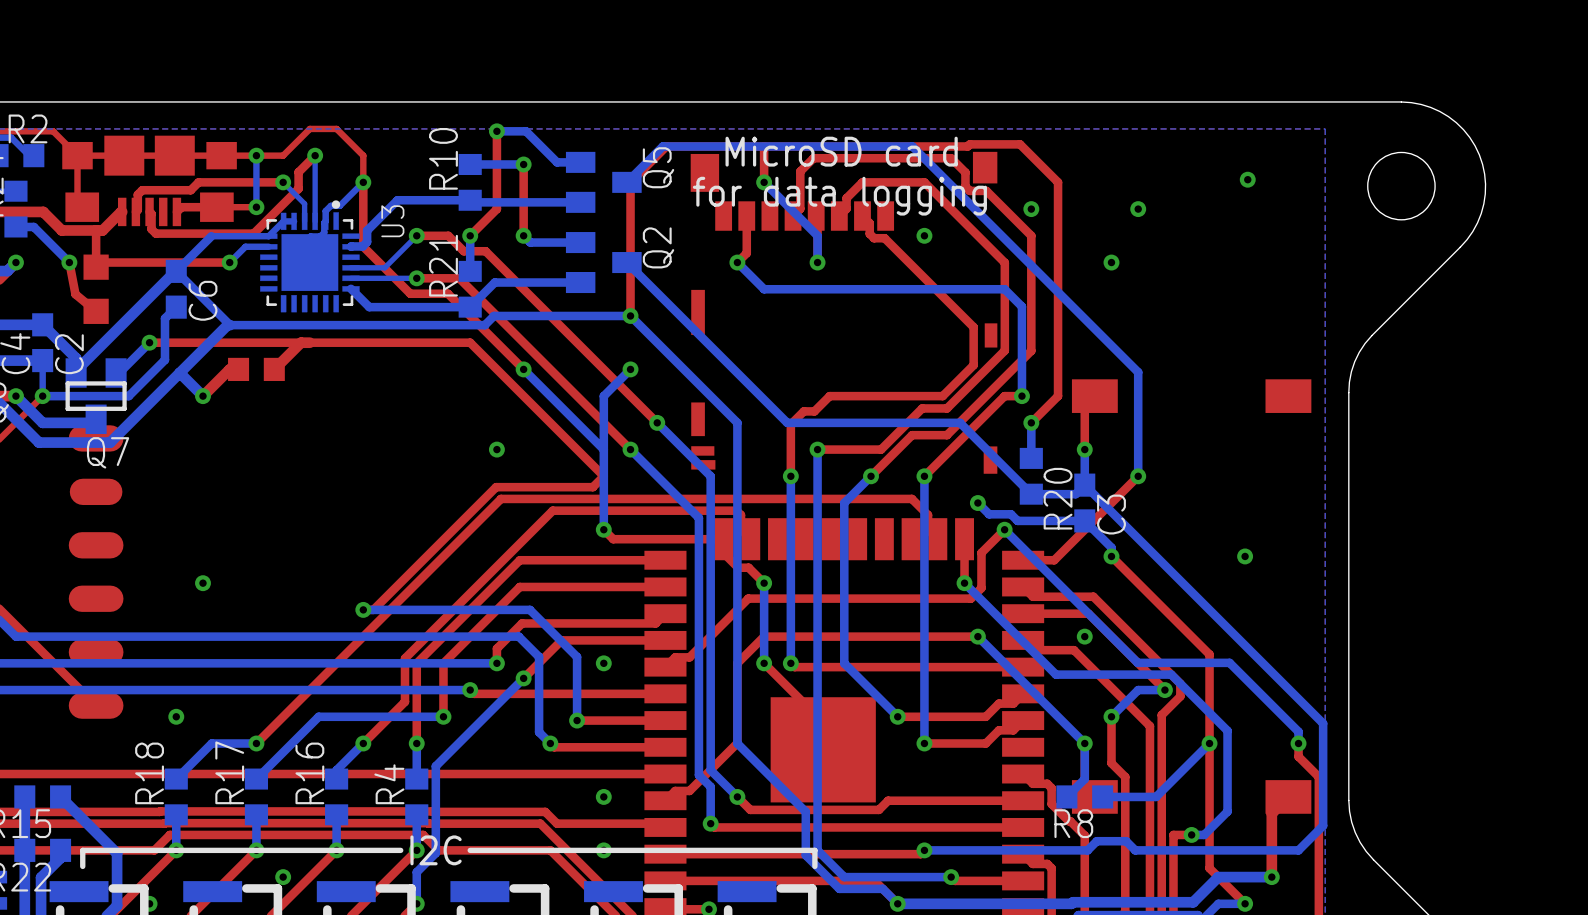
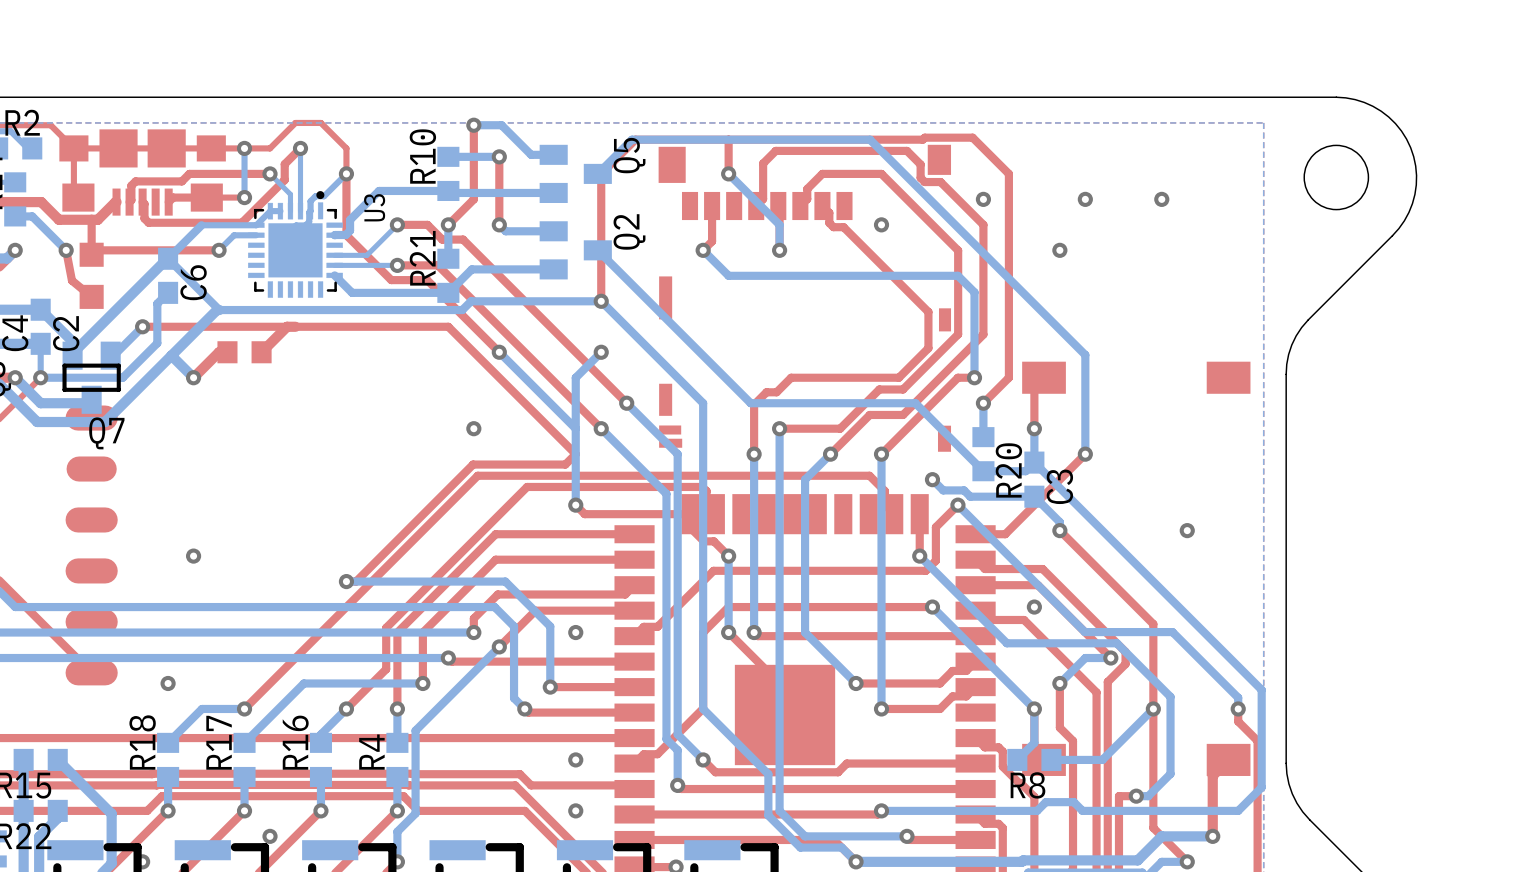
text: MicroSD card (841, 151) -> none
via position: (1247, 179) -> (1161, 199)
text: for data logging (839, 196) -> none
line: (400, 850) (82, 850) (82, 866) -> none
text: I2C (436, 850) -> none
line: (470, 850) (814, 850) (814, 866) -> none

